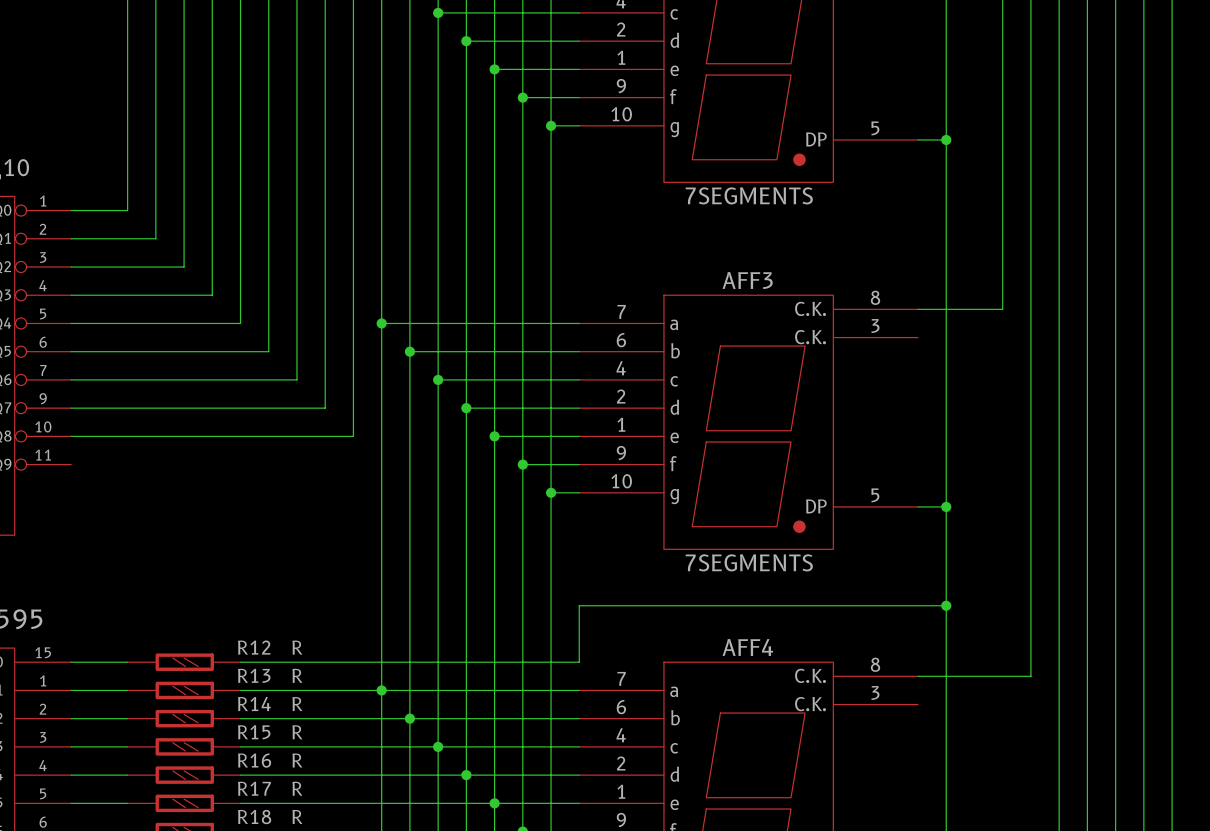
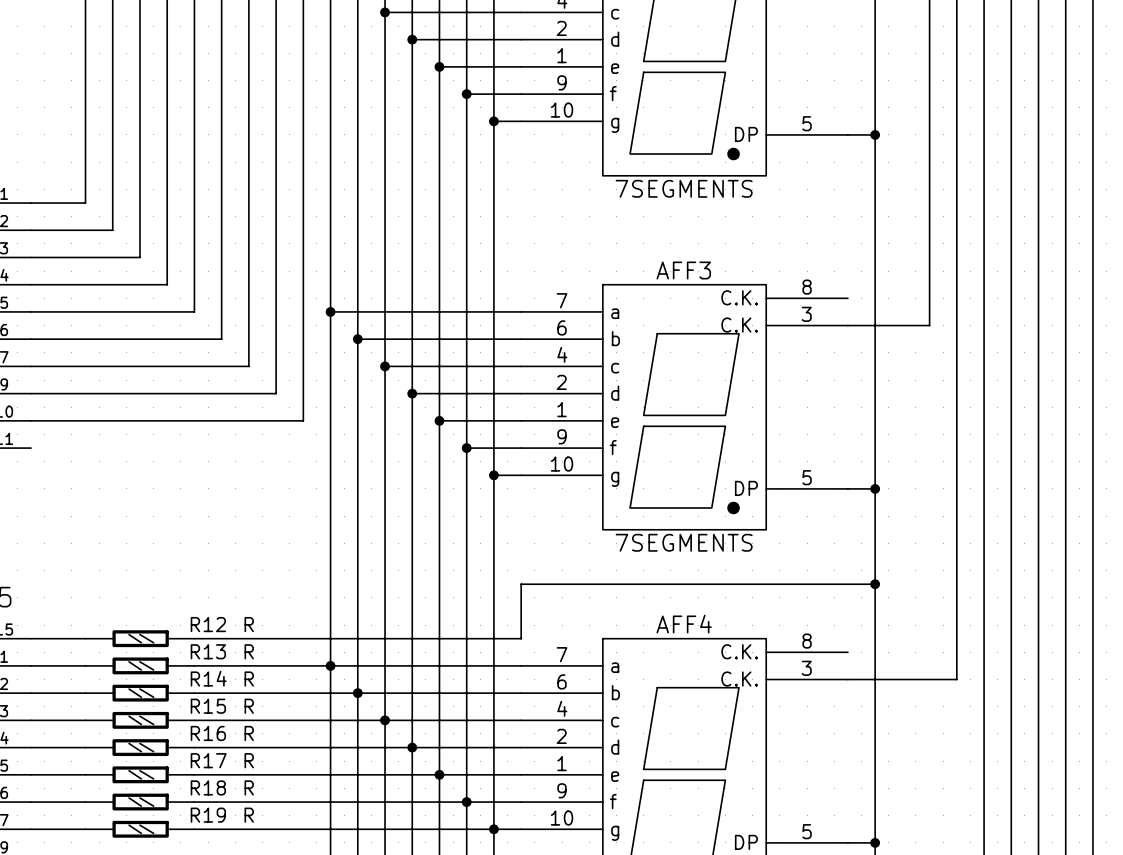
wire: (918, 309) (1002, 309) -> (847, 325) (929, 325) (929, 298)
wire: (918, 676) (1030, 676) -> (847, 679) (956, 679) (956, 652)

